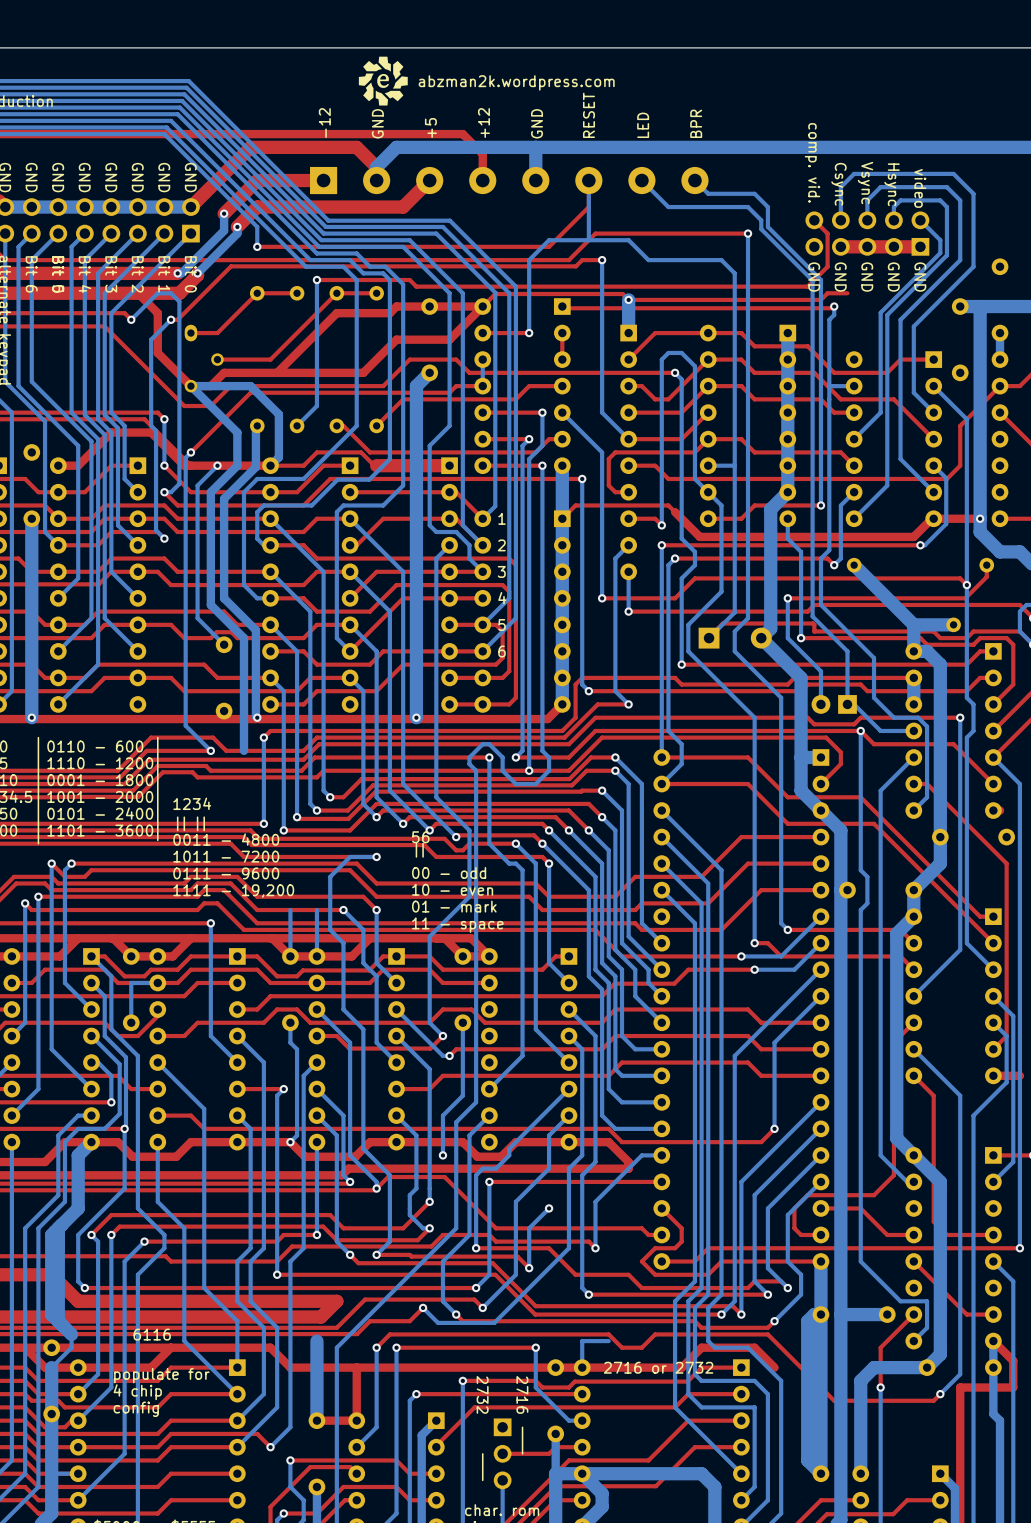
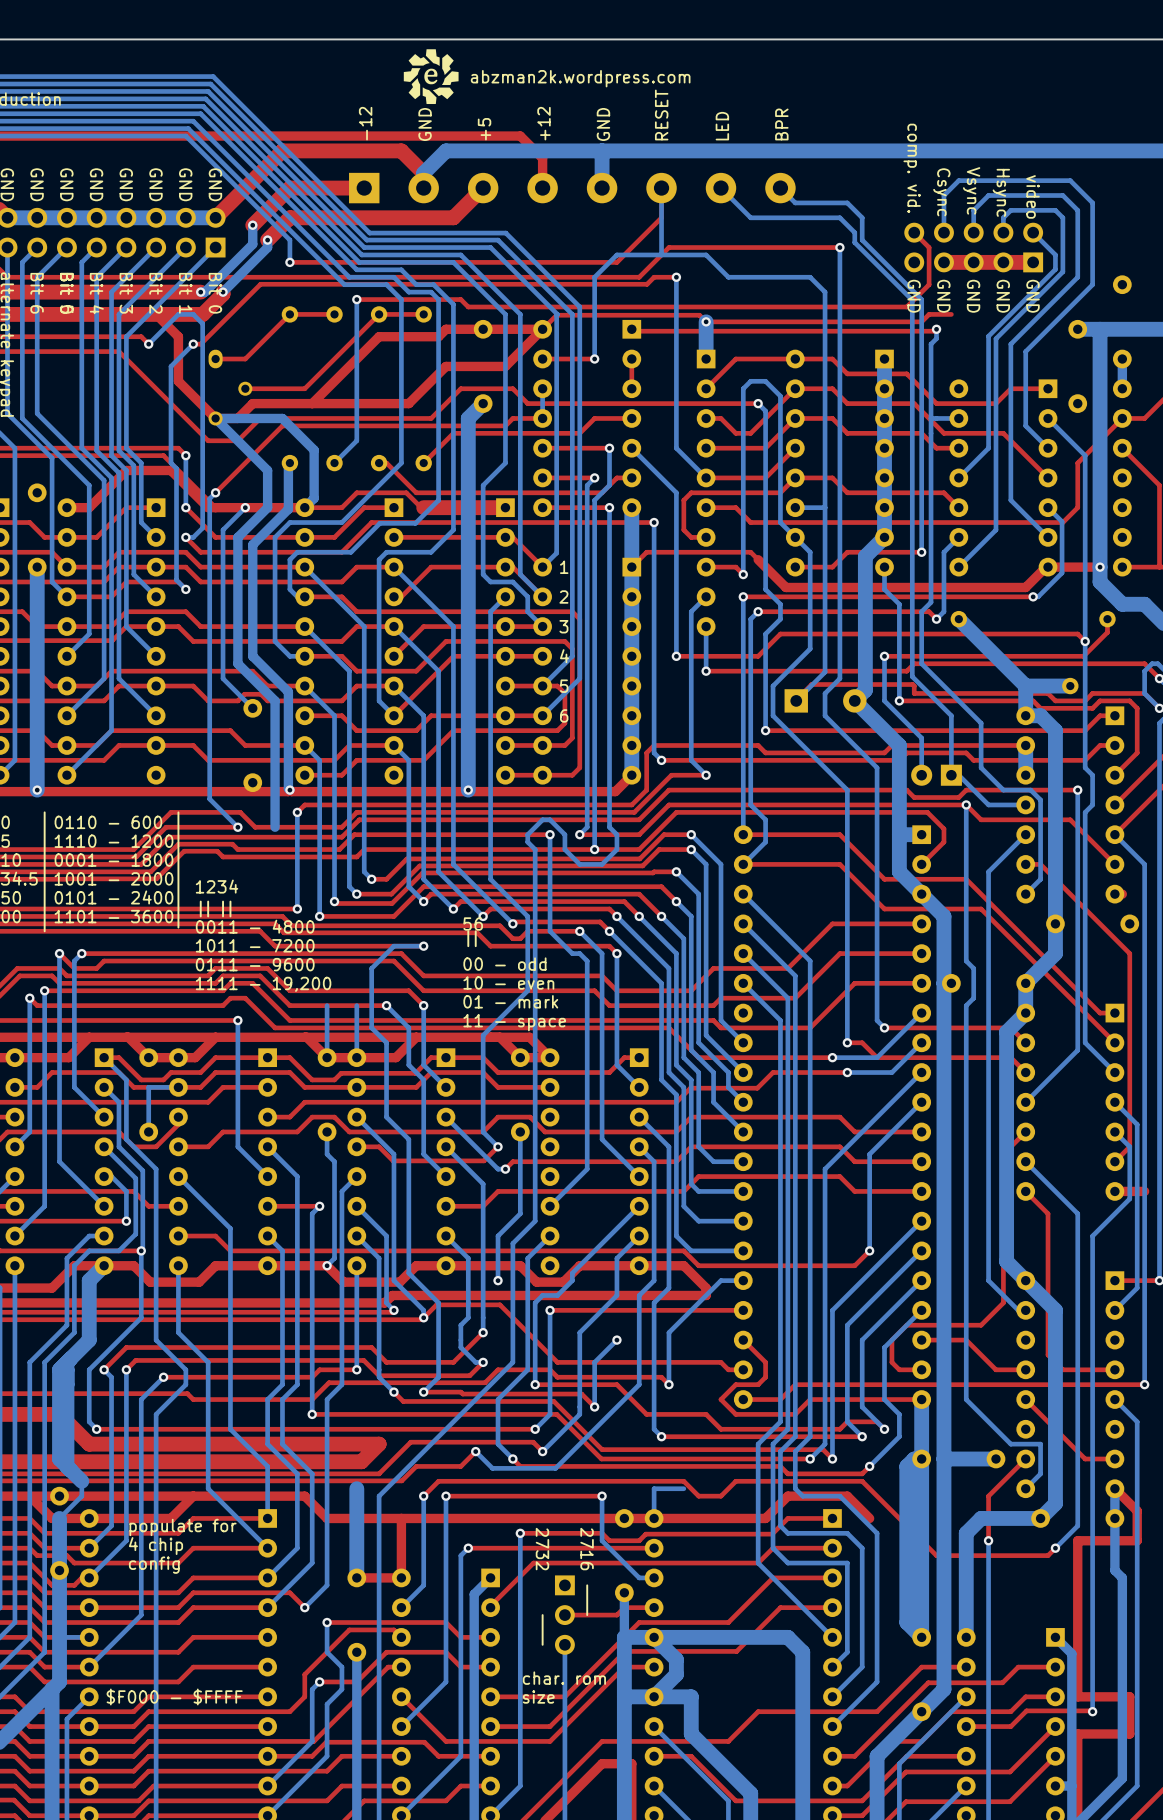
text: 6116 (152, 1334) -> none
text: 2716 or 2732 (658, 1367) -> none

